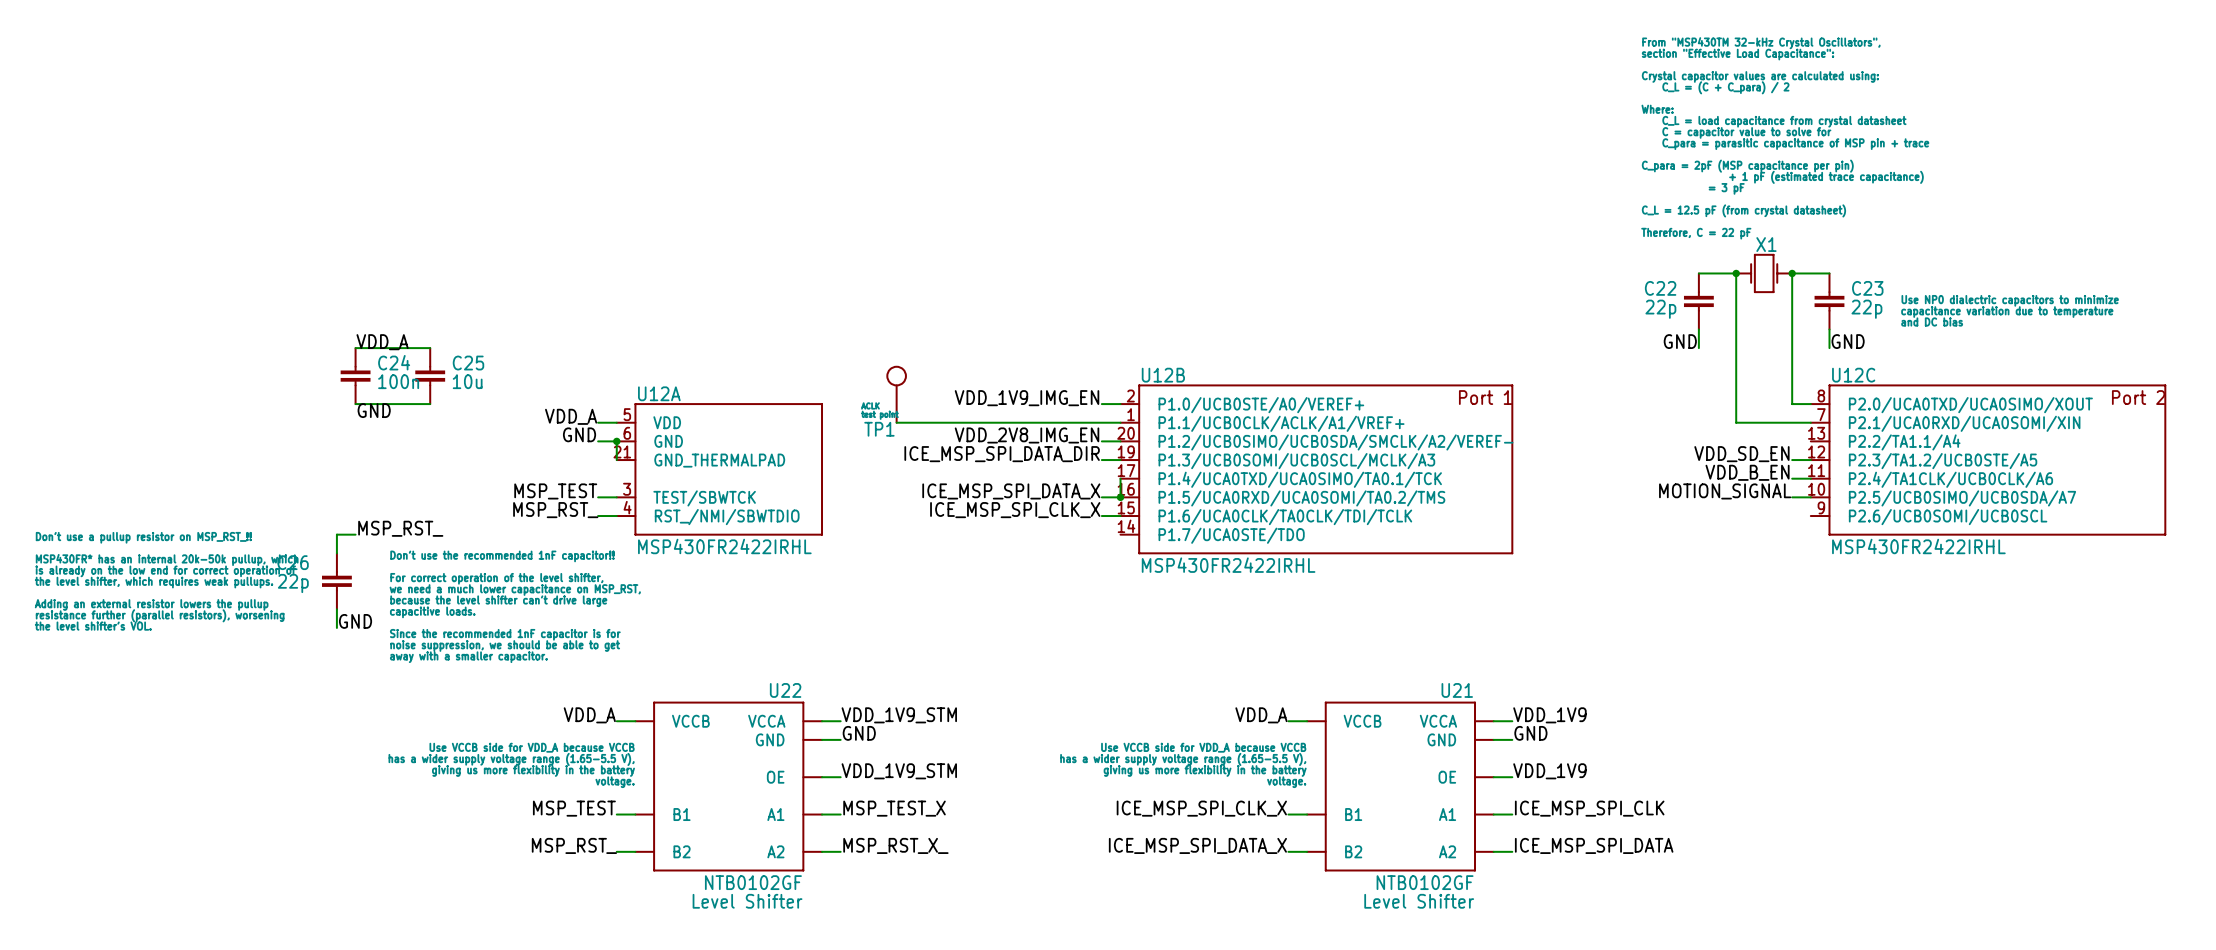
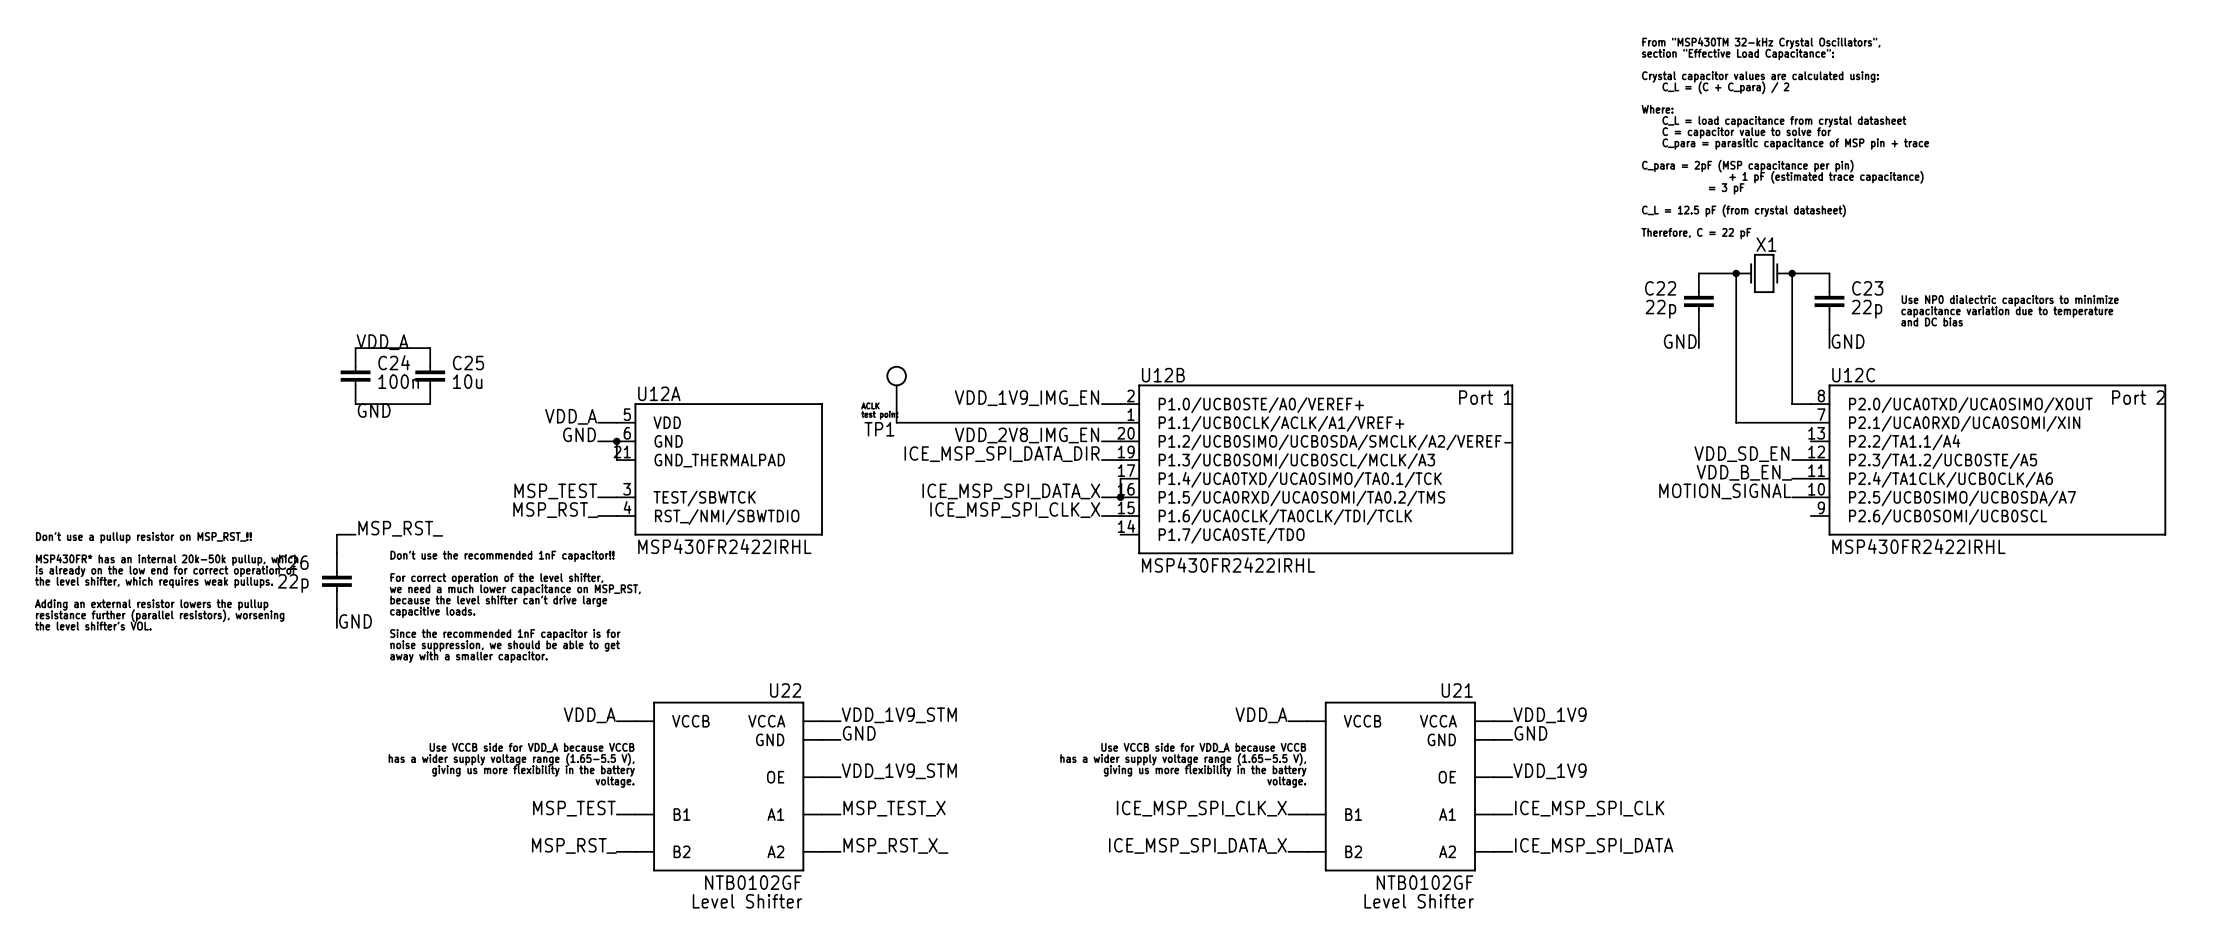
label: VDD_B_EN (1747, 472) -> VDD_B_EN_ (1744, 472)

